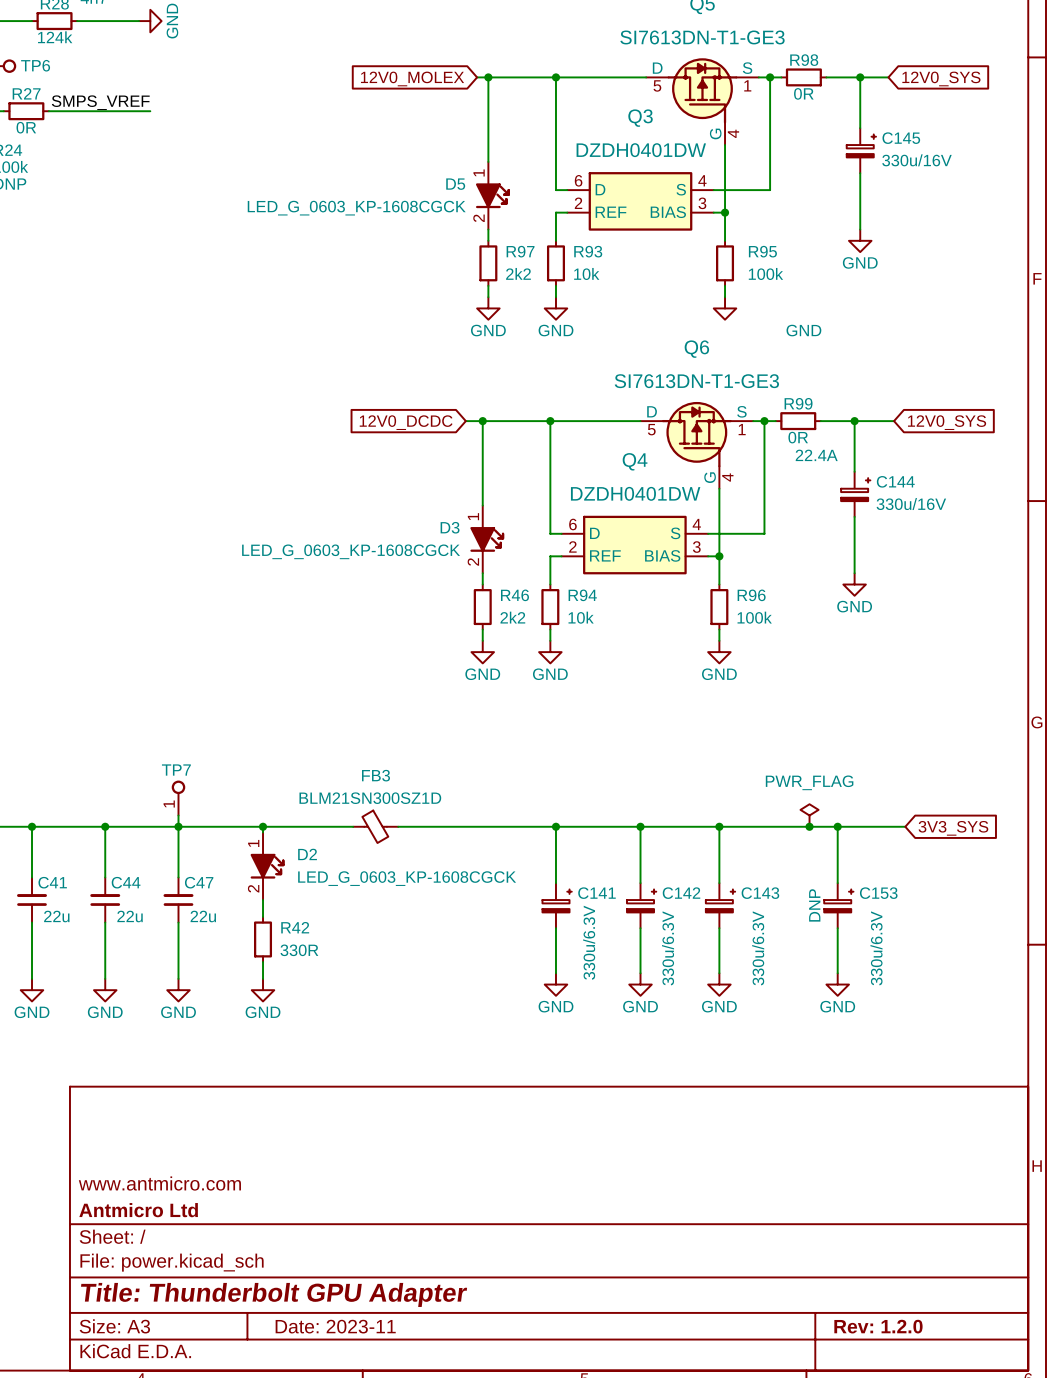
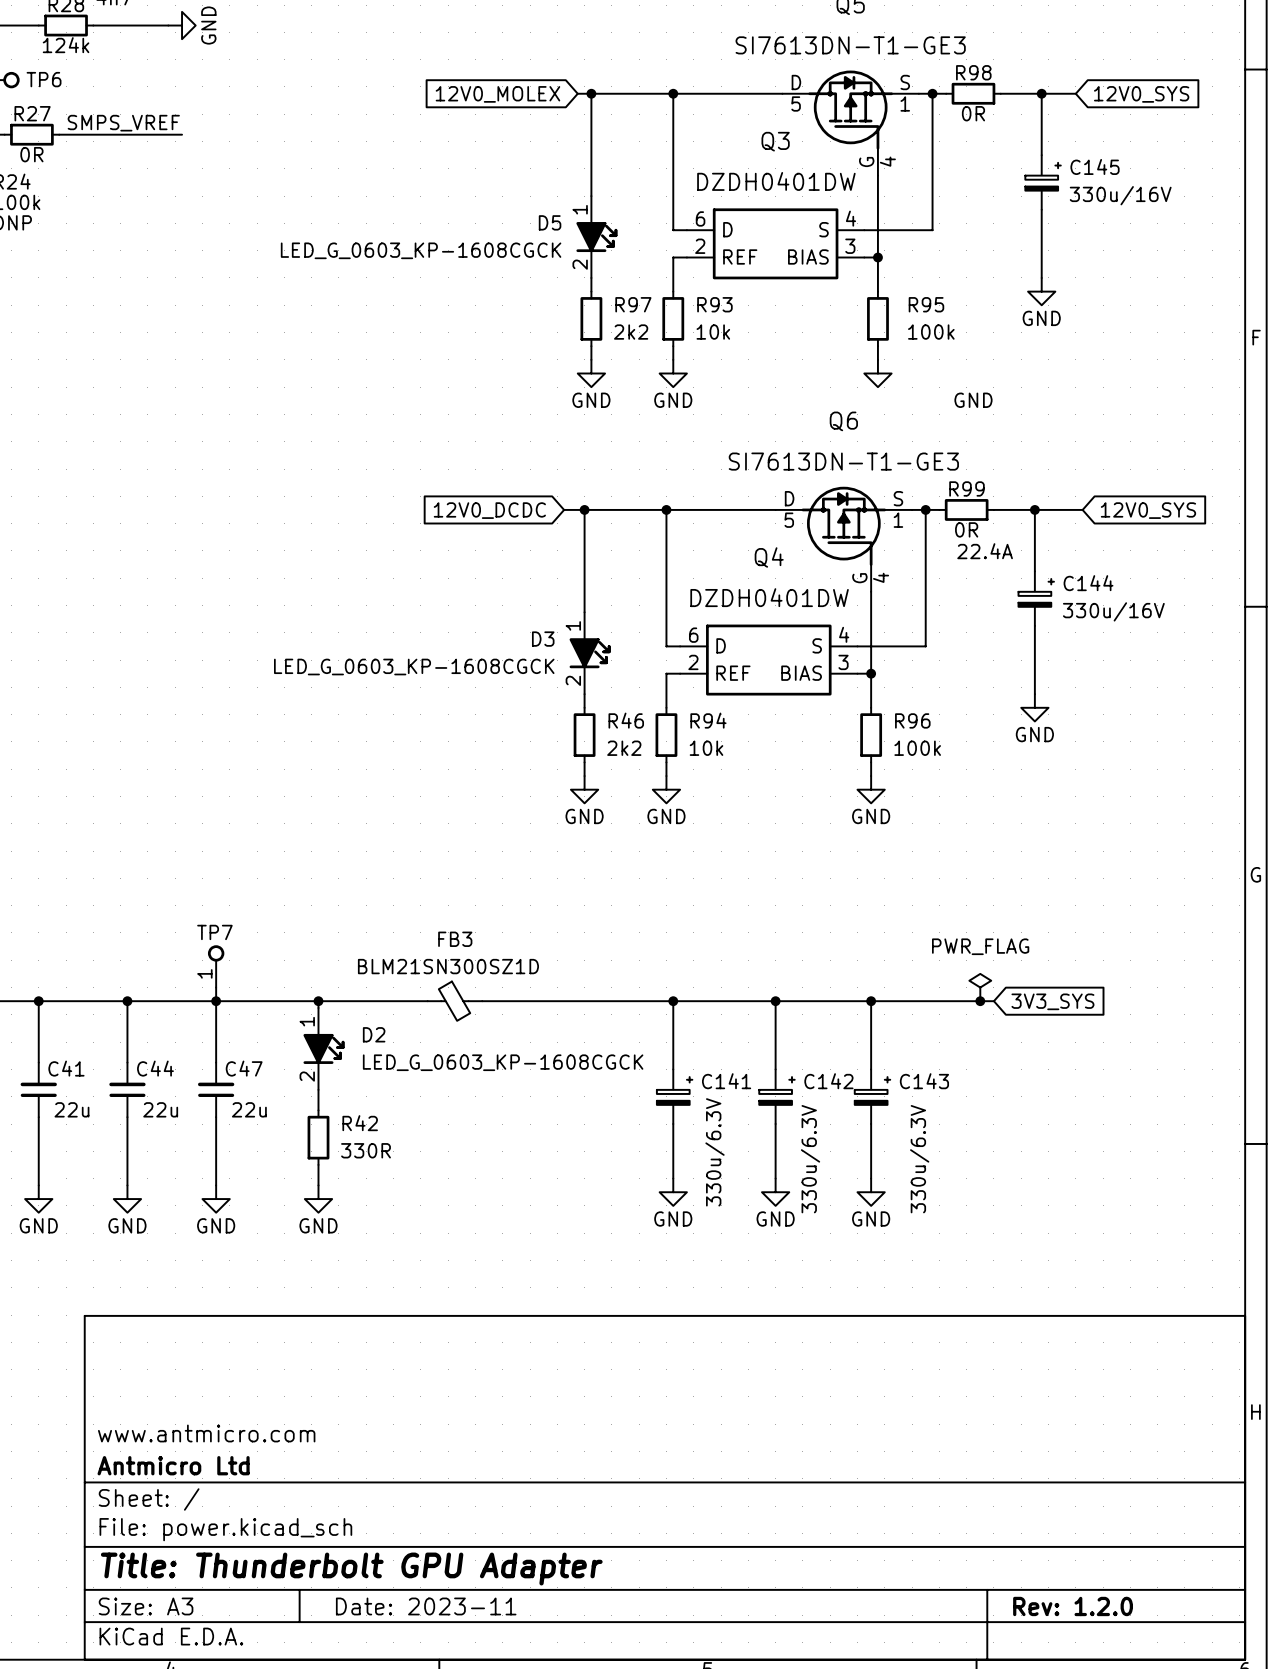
wire: (820, 826) (905, 826) -> none
wire: (837, 826) (837, 883) -> none
junction: (837, 826) -> none
global label position: 3V3_SYS (953, 828) -> 3V3_SYS (1052, 1001)
C153: (838, 905) -> none
wire: (837, 928) (837, 973) -> none
power symbol: GND (837, 984) -> none

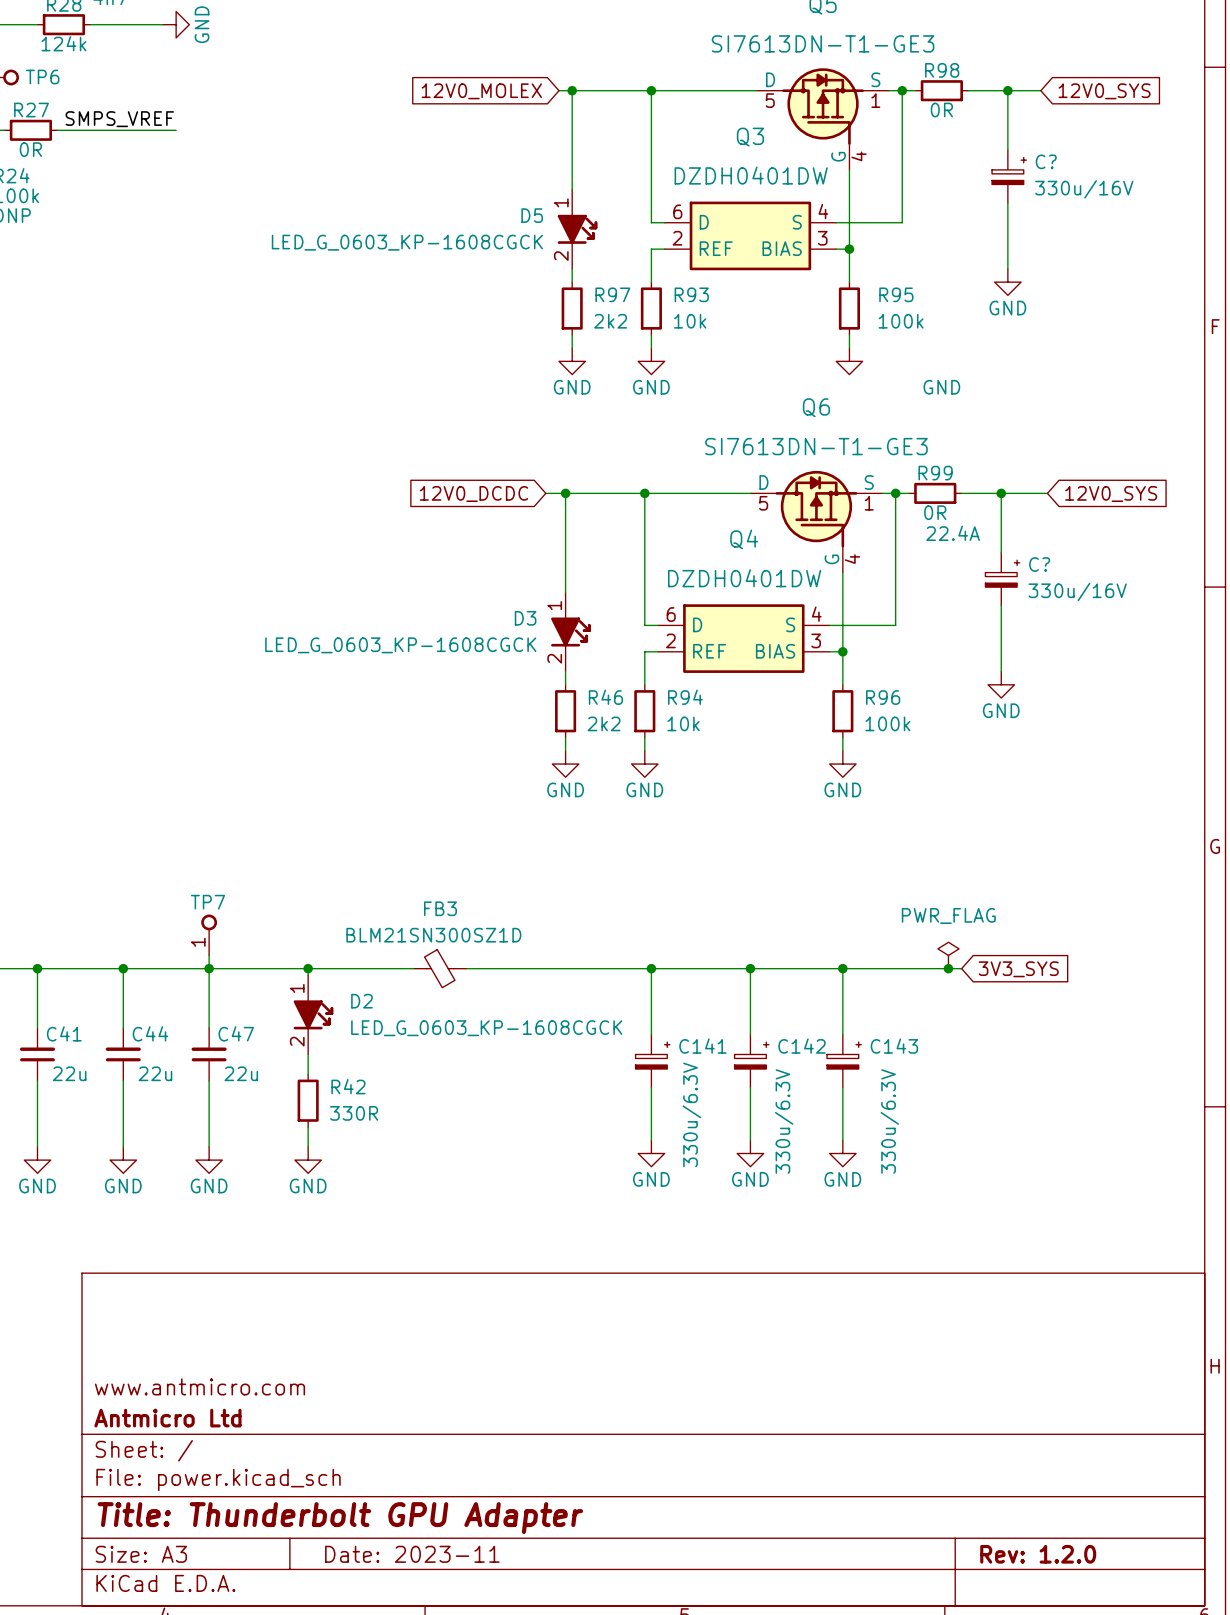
C145 name: C145 (1095, 166) -> C? (1046, 161)
C144 name: C144 (1088, 583) -> C? (1039, 564)

